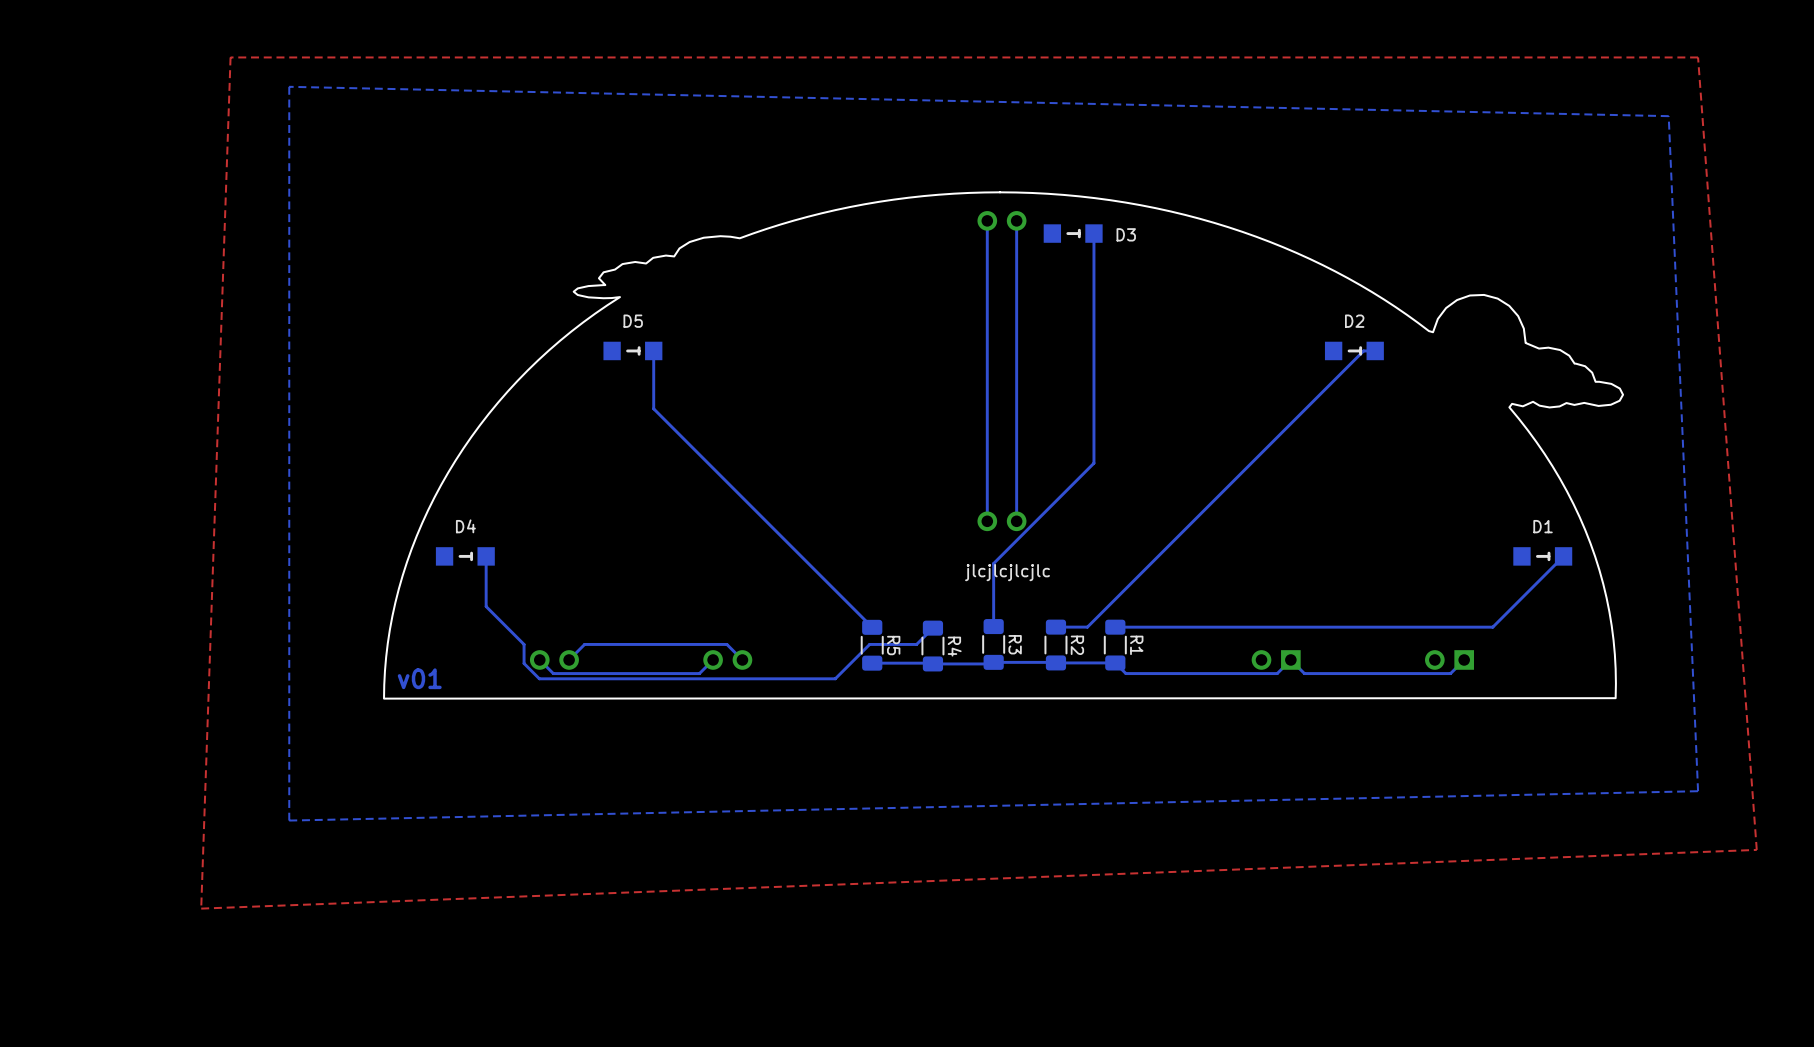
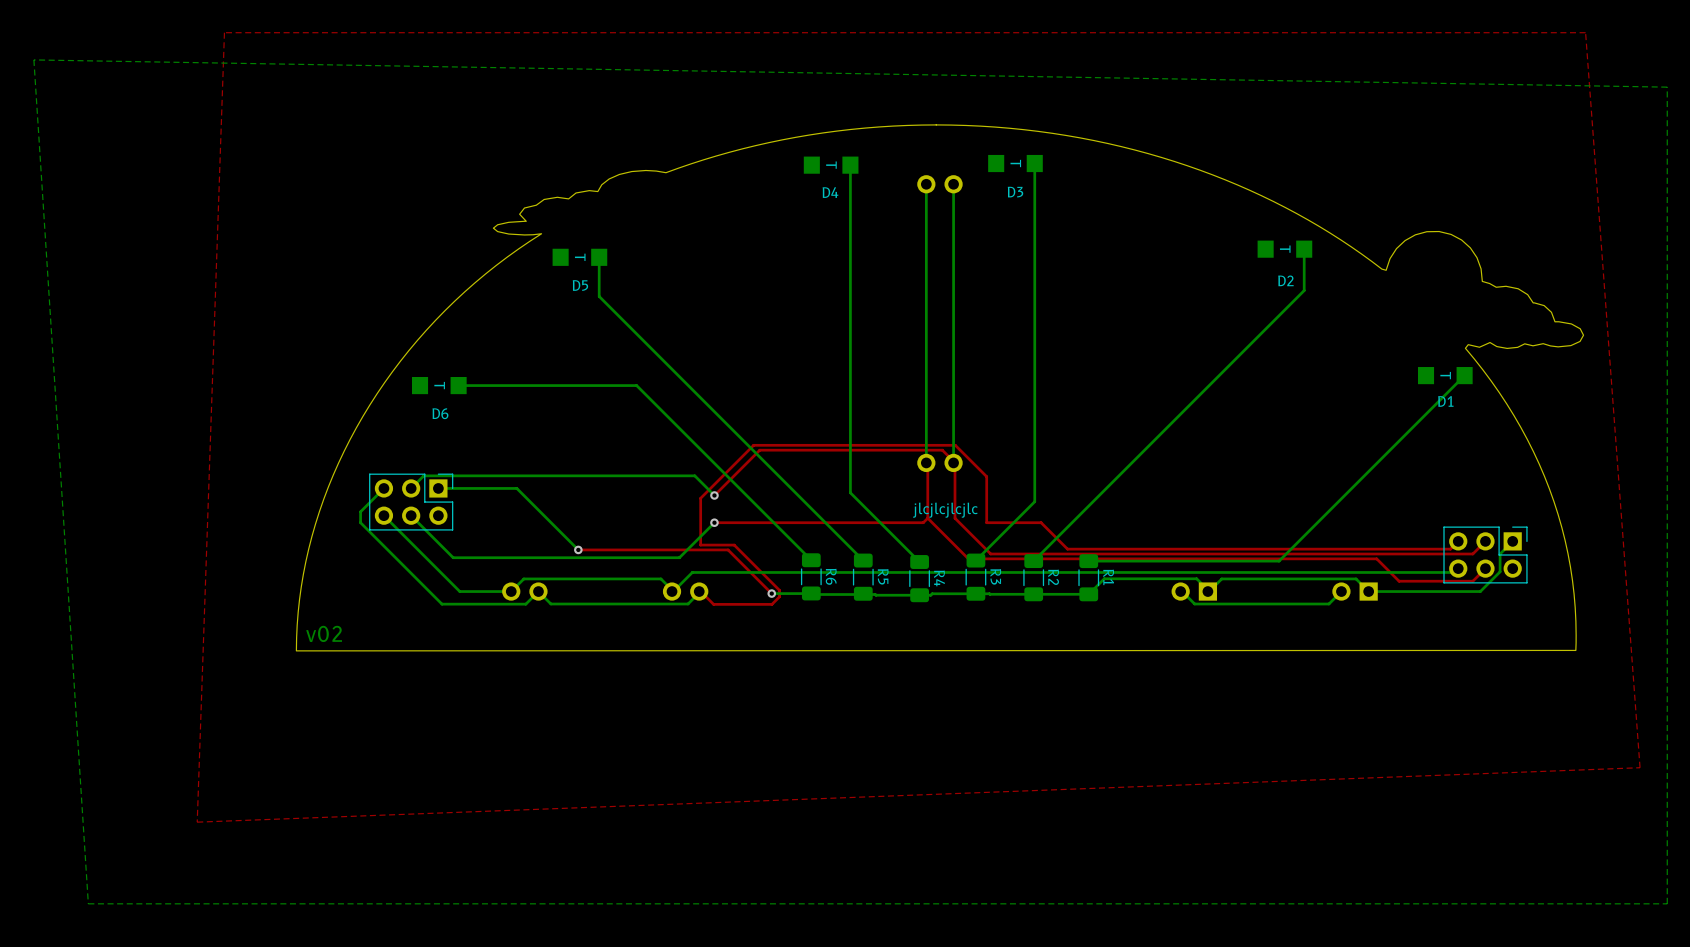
bottom zone outline: (289, 86) (1668, 116) (1698, 791) (289, 820) (289, 86) -> (33, 59) (1667, 87) (1667, 903) (88, 903) (33, 59)
drawing shape: [384, 192, 1624, 699] -> [296, 124, 1584, 651]
bottom track: none -> (1034, 163) (1034, 501) (975, 560)
bottom track: none -> (850, 165) (850, 492) (919, 562)
D3 position: (1073, 233) -> (1015, 163)
bottom track: (1093, 233) (1093, 463) (993, 563) (993, 626) -> none
D3 name position: D3 (1126, 234) -> D3 (1015, 192)
bottom track: none -> (1304, 249) (1304, 290) (1033, 561)
bottom track: none -> (599, 257) (599, 296) (863, 560)
D5 name position: D5 (633, 321) -> D5 (580, 285)
D2 name position: D2 (1354, 321) -> D2 (1285, 280)
D5 position: (632, 350) -> (579, 257)
bottom track: (653, 350) (653, 408) (872, 627) -> none
D2 position: (1354, 350) -> (1284, 249)
bottom track: (1375, 350) (1363, 350) (1087, 627) (1055, 627) -> none
D6: none -> (439, 385)
bottom track: none -> (458, 385) (636, 385) (811, 560)
top track: none -> (927, 462) (927, 518)
D4 name position: D4 (465, 526) -> D4 (830, 192)
D1 name position: D1 (1543, 526) -> D1 (1445, 401)
bottom track: none -> (411, 488) (423, 475) (694, 475) (714, 495)
bottom track: none -> (438, 488) (516, 488) (578, 549)
D4 position: (465, 556) -> (831, 165)
bottom track: (486, 556) (486, 606) (524, 644) (524, 663) (539, 678) (835, 678) (869, 644) (916, 644) (932, 628) -> none
top track: none -> (714, 495) (759, 450) (942, 450) (954, 462) (954, 518) (990, 554) (1472, 554) (1485, 541)
via: none -> (714, 495)
D1 position: (1542, 556) -> (1445, 375)
bottom track: (1563, 556) (1492, 627) (1367, 627) -> (1464, 375) (1279, 561)
part: none -> (411, 502)
bottom track: none -> (383, 515) (459, 591) (511, 591) (523, 578) (660, 578) (673, 591) (692, 572) (1454, 572) (1458, 568)
bottom track: none -> (411, 515) (453, 557) (679, 557) (714, 522)
top track: none -> (927, 518) (923, 522) (714, 522)
top track: none -> (927, 518) (968, 558) (1376, 558) (1399, 581) (1472, 581) (1485, 568)
via: none -> (714, 522)
top track: none -> (1458, 541) (1450, 549) (1067, 549) (1041, 522) (986, 522) (986, 476) (955, 445) (753, 445) (700, 498) (700, 545) (734, 545) (779, 590) (779, 596) (771, 604) (713, 604) (700, 591)
top track: none -> (578, 549) (728, 549) (771, 593)
via: none -> (578, 549)
part: none -> (1485, 555)
bottom track: (1162, 627) (1115, 627) -> none
R6: none -> (811, 576)
R3 position: (993, 644) -> (975, 577)
R5 position: (872, 645) -> (863, 577)
R2 position: (1055, 645) -> (1033, 577)
R1 position: (1115, 645) -> (1088, 577)
R4 position: (932, 646) -> (919, 578)
bottom track: (539, 659) (553, 673) -> (383, 488) (360, 511) (360, 522) (442, 604) (523, 604)
bottom track: (713, 659) (699, 673) (555, 673) -> (700, 591) (688, 604) (550, 604) (538, 591) (525, 604)
bottom track: (742, 659) (726, 644) (584, 644) (569, 659) -> none
bottom track: none -> (1182, 591) (1194, 604) (1328, 604) (1341, 591)
bottom track: (1464, 659) (1450, 673) (1304, 673) (1290, 659) (1277, 673) (1125, 673) (1115, 662) -> (1512, 541) (1500, 554) (1500, 571) (1480, 591) (1368, 591) (1356, 578) (1221, 578) (1209, 591) (1196, 578) (1104, 578) (1088, 594) (1045, 594)
via: none -> (771, 593)
bottom track: none -> (811, 593) (771, 593)
text: v01 (419, 678) -> none
text: none -> v02 (324, 633)

